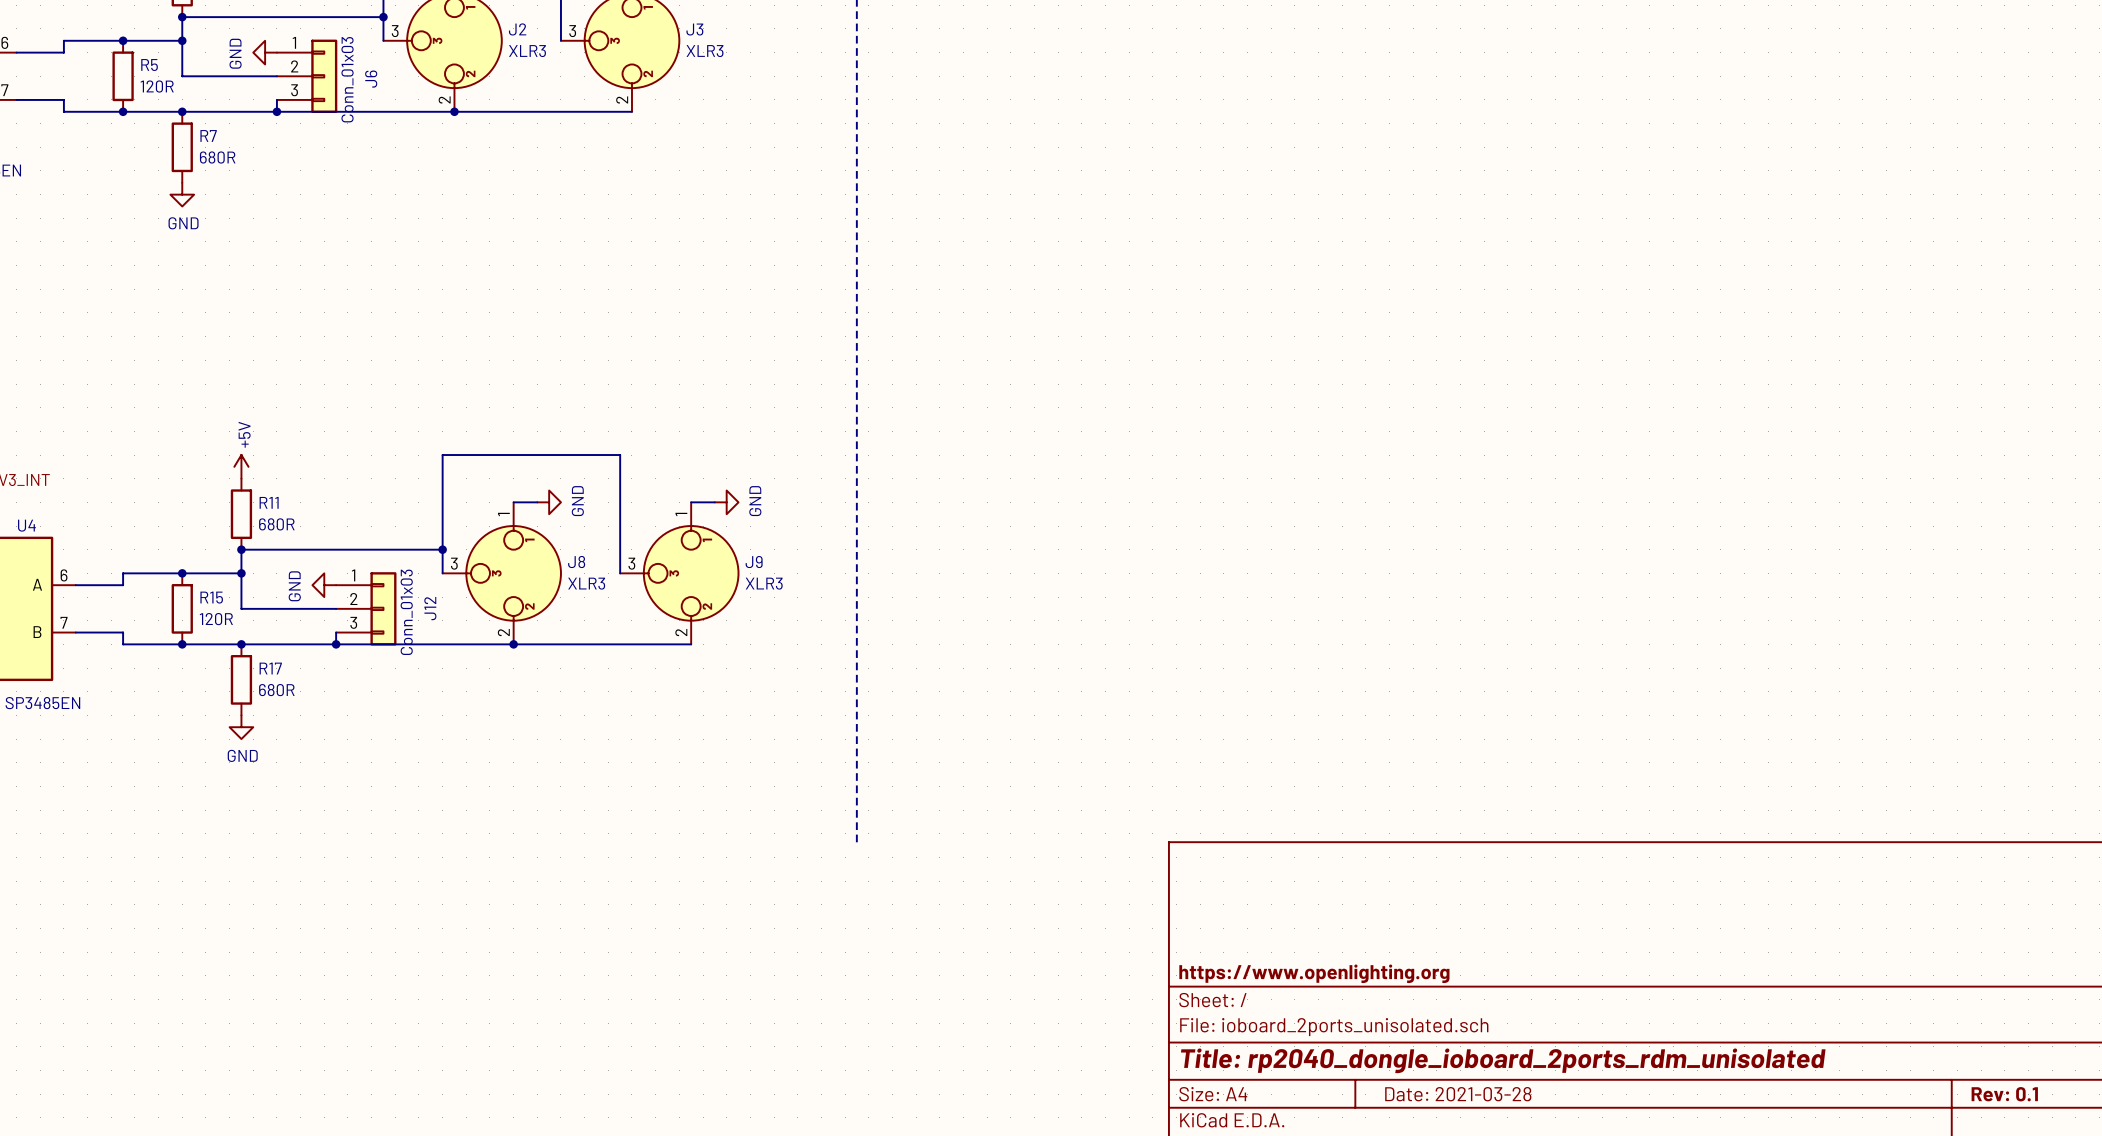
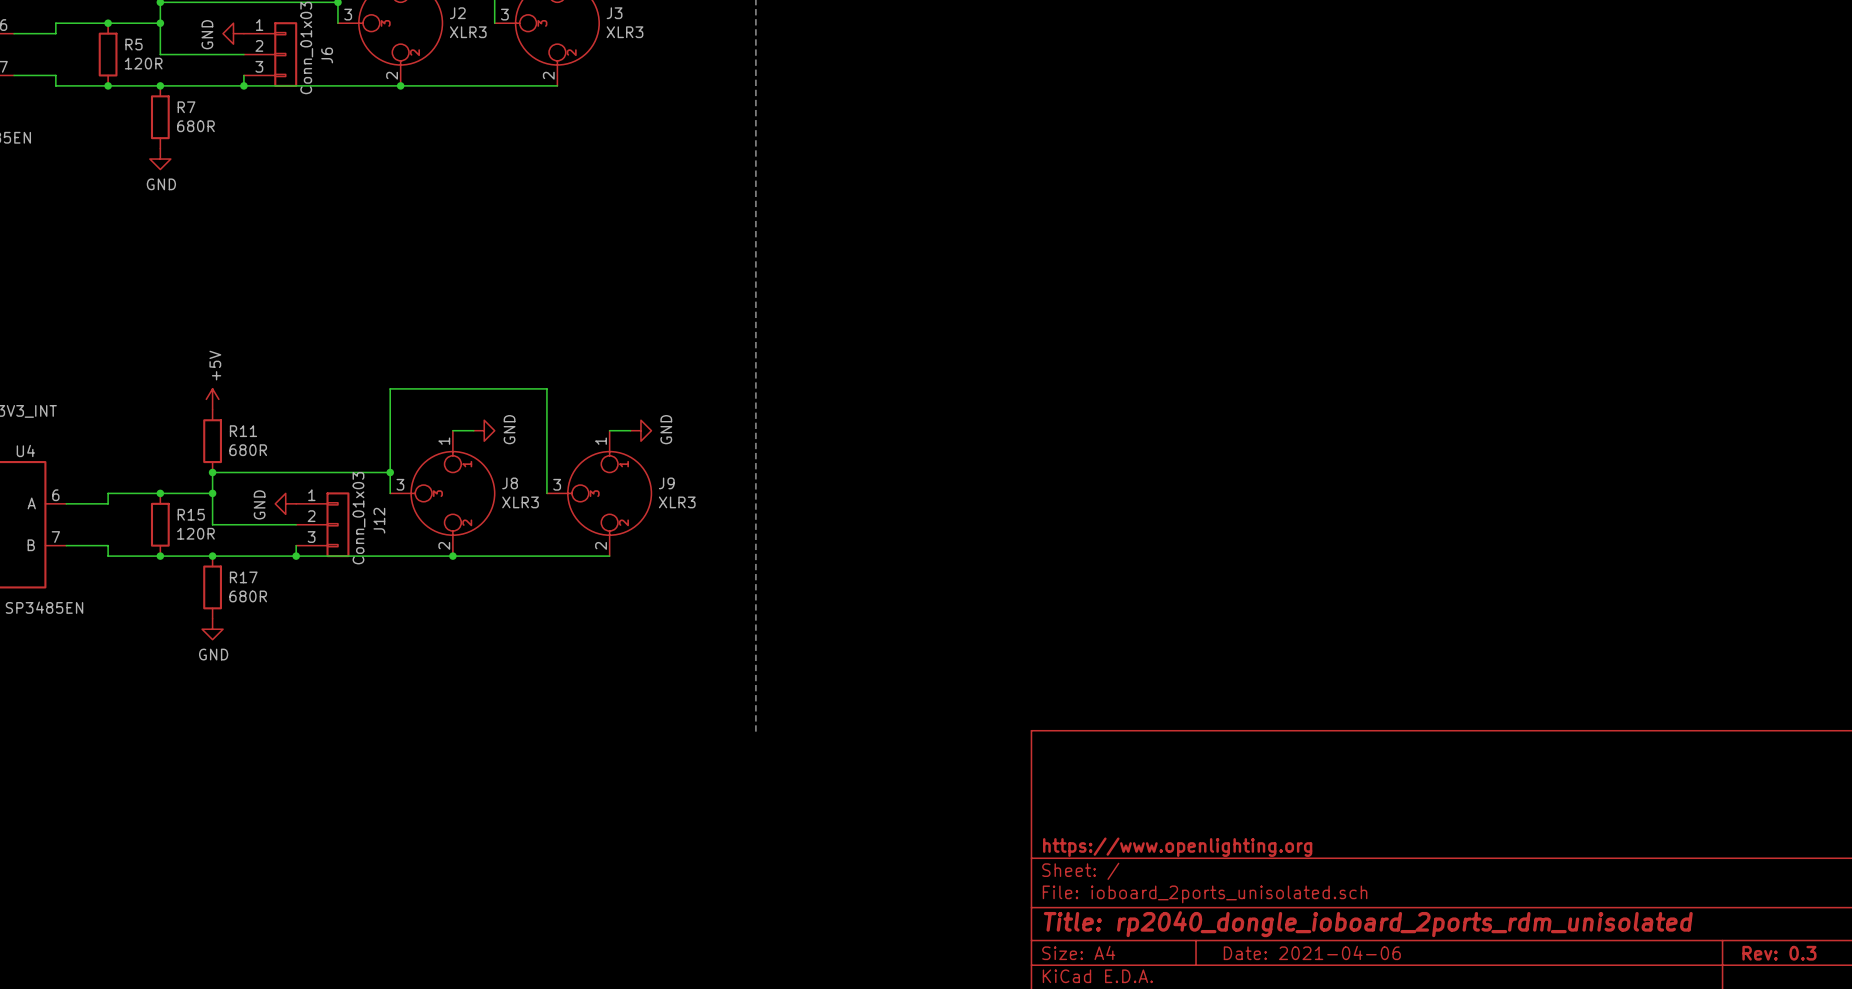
title block: Date: 2021-03-28 (1458, 1094) -> Date: 2021-04-06 (1312, 952)
title block: Rev: 0.1 (2004, 1094) -> Rev: 0.3 (1779, 953)

